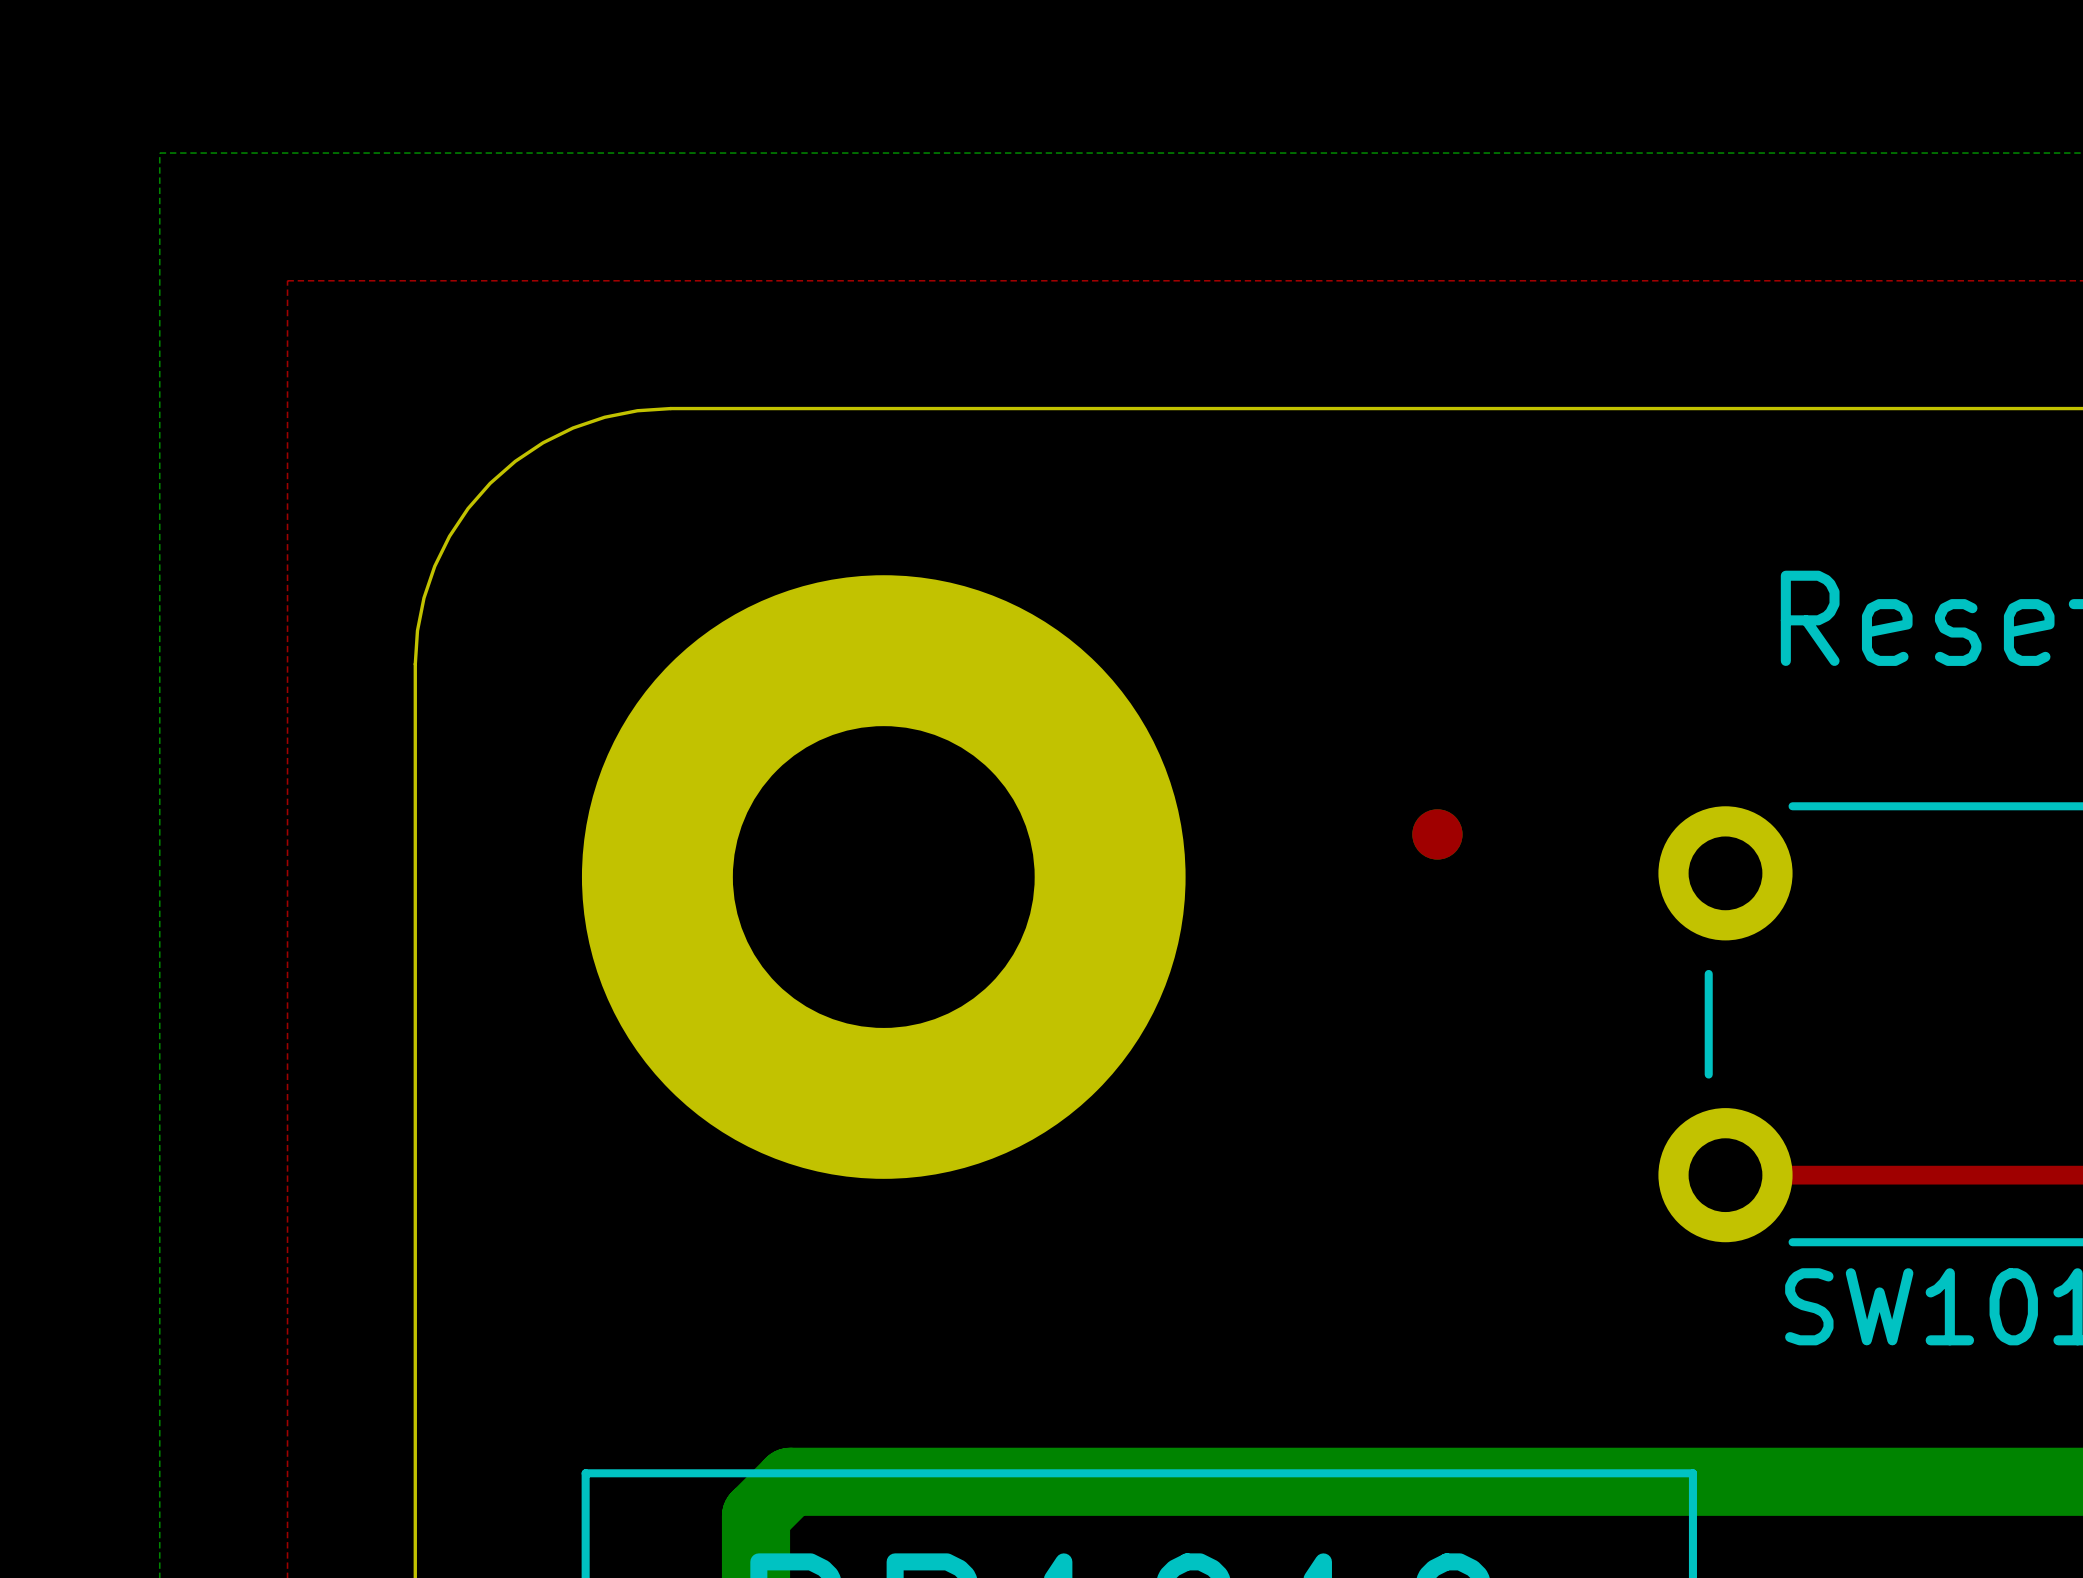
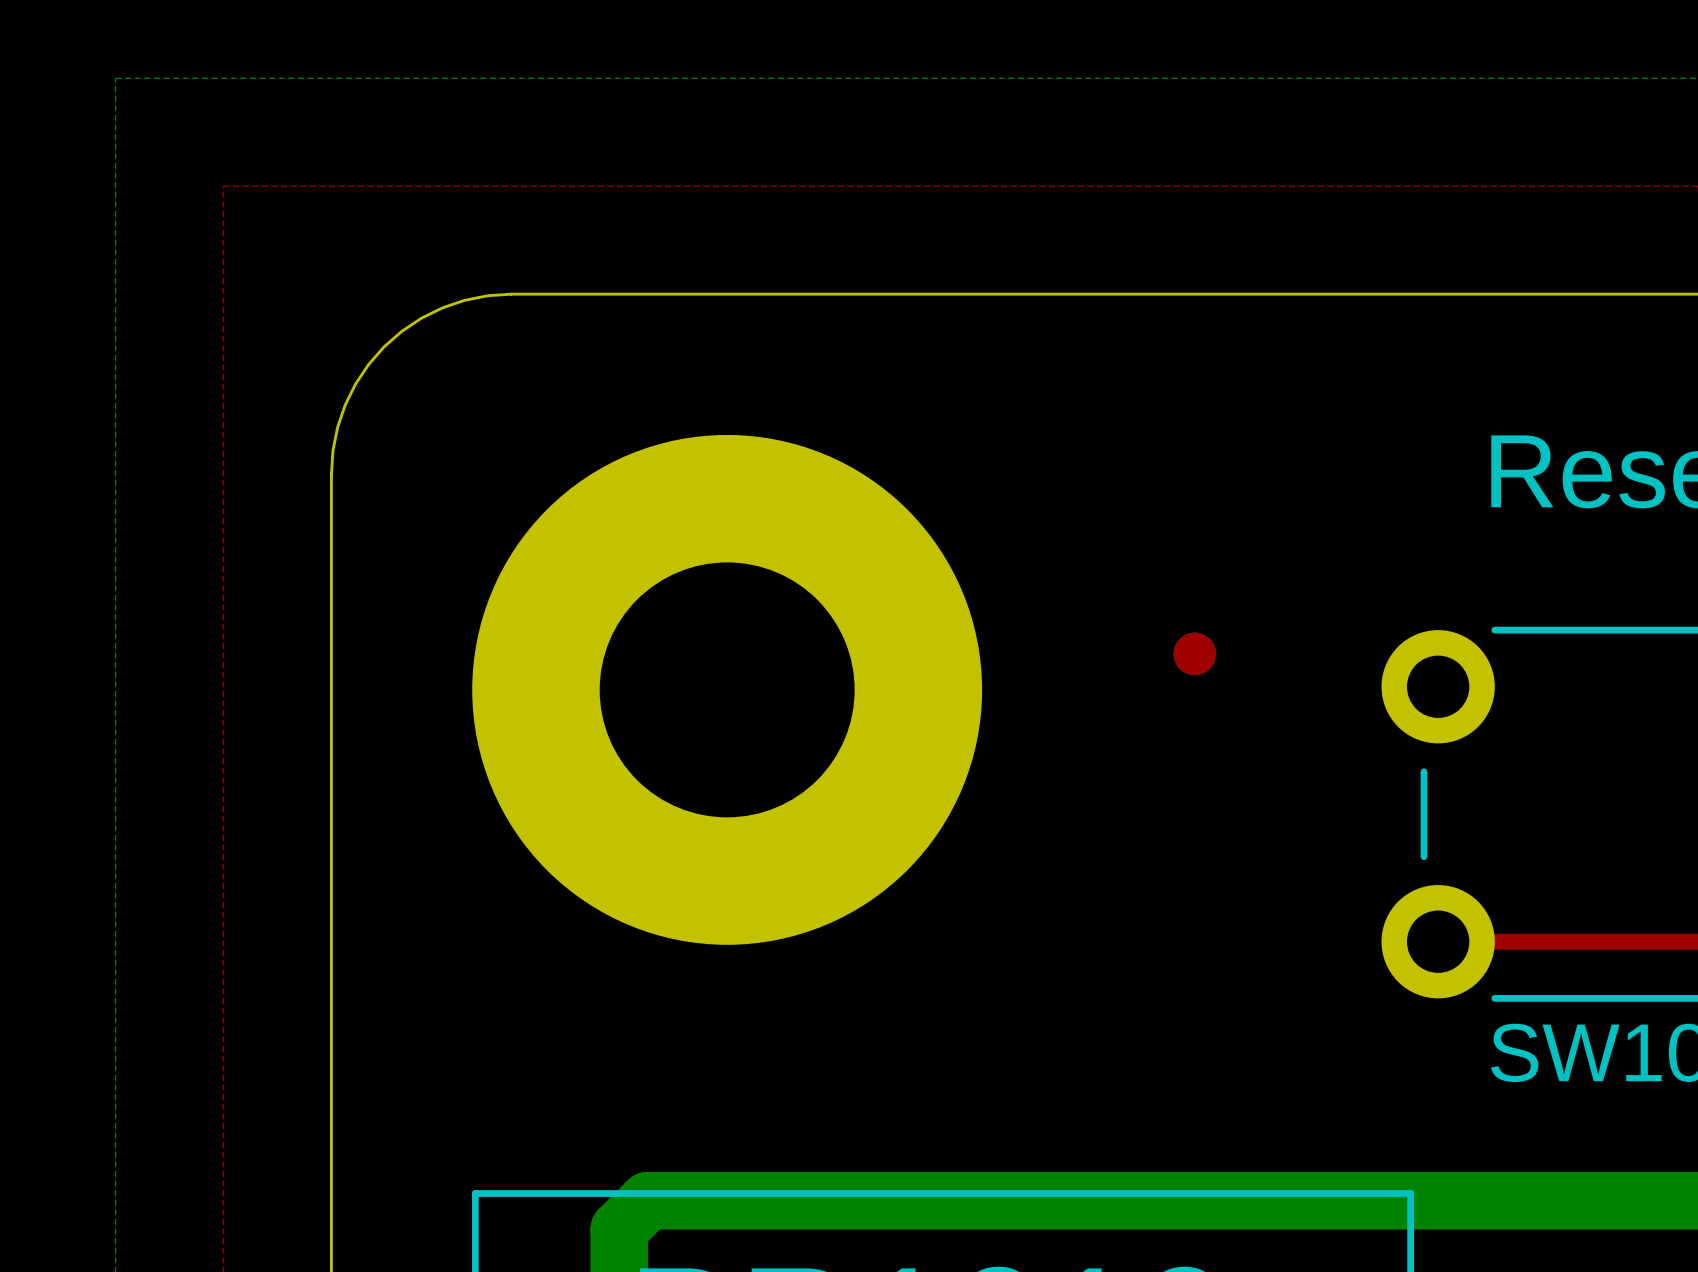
board edge: (670, 408) (637, 410) (604, 417) (573, 428) (543, 442) (515, 461) (490, 483) (468, 508) (449, 536) (434, 566) (424, 597) (417, 630) (415, 664) -> (547, 294) (487, 295) (464, 300) (442, 307) (421, 318) (401, 331) (384, 346) (368, 364) (355, 384) (345, 405) (337, 427) (332, 450) (331, 510)

